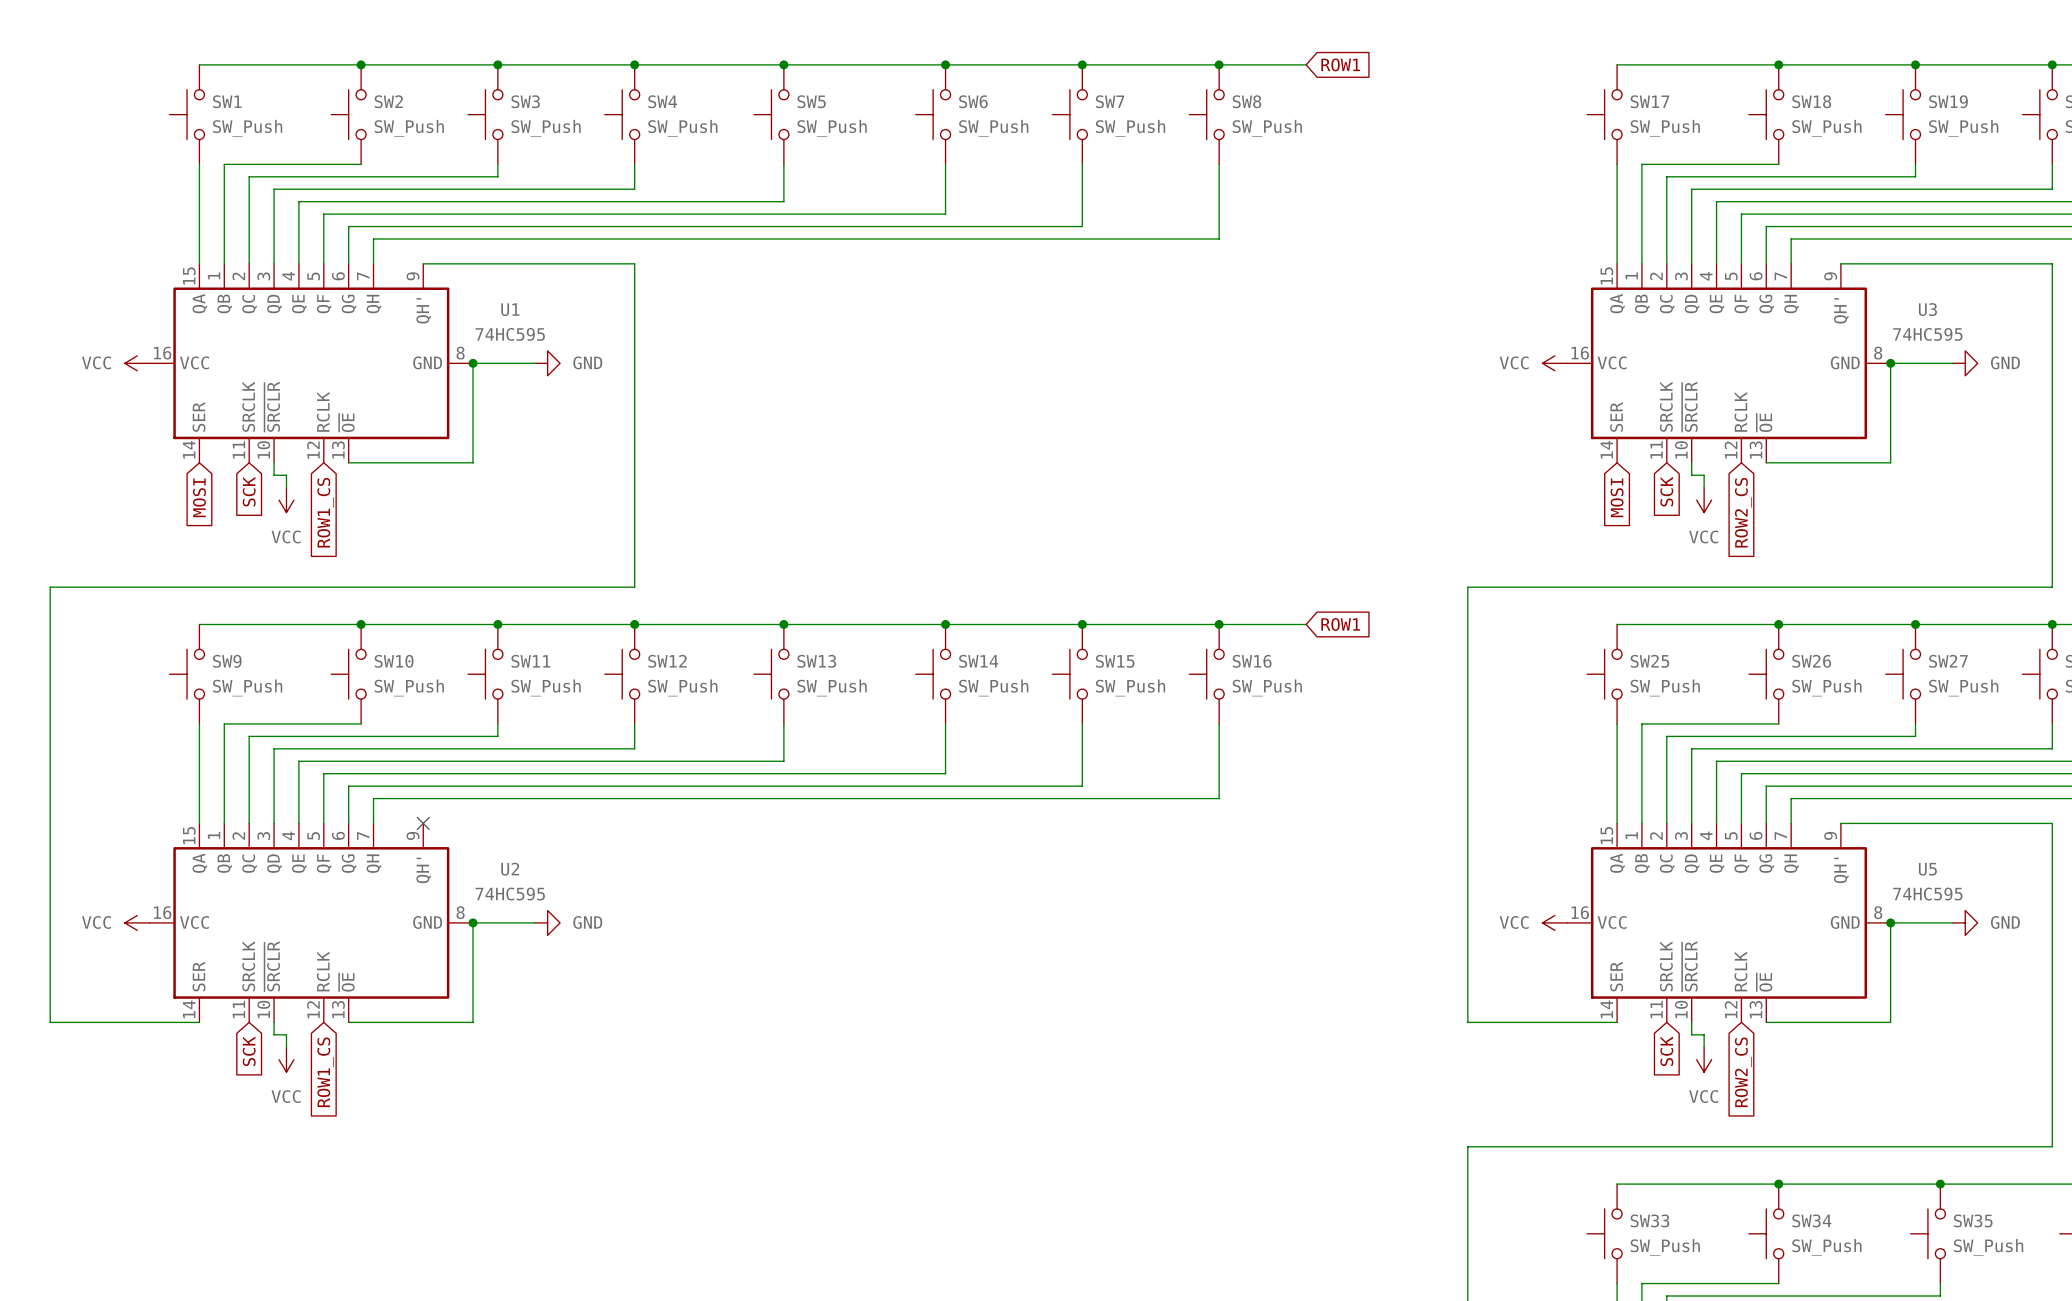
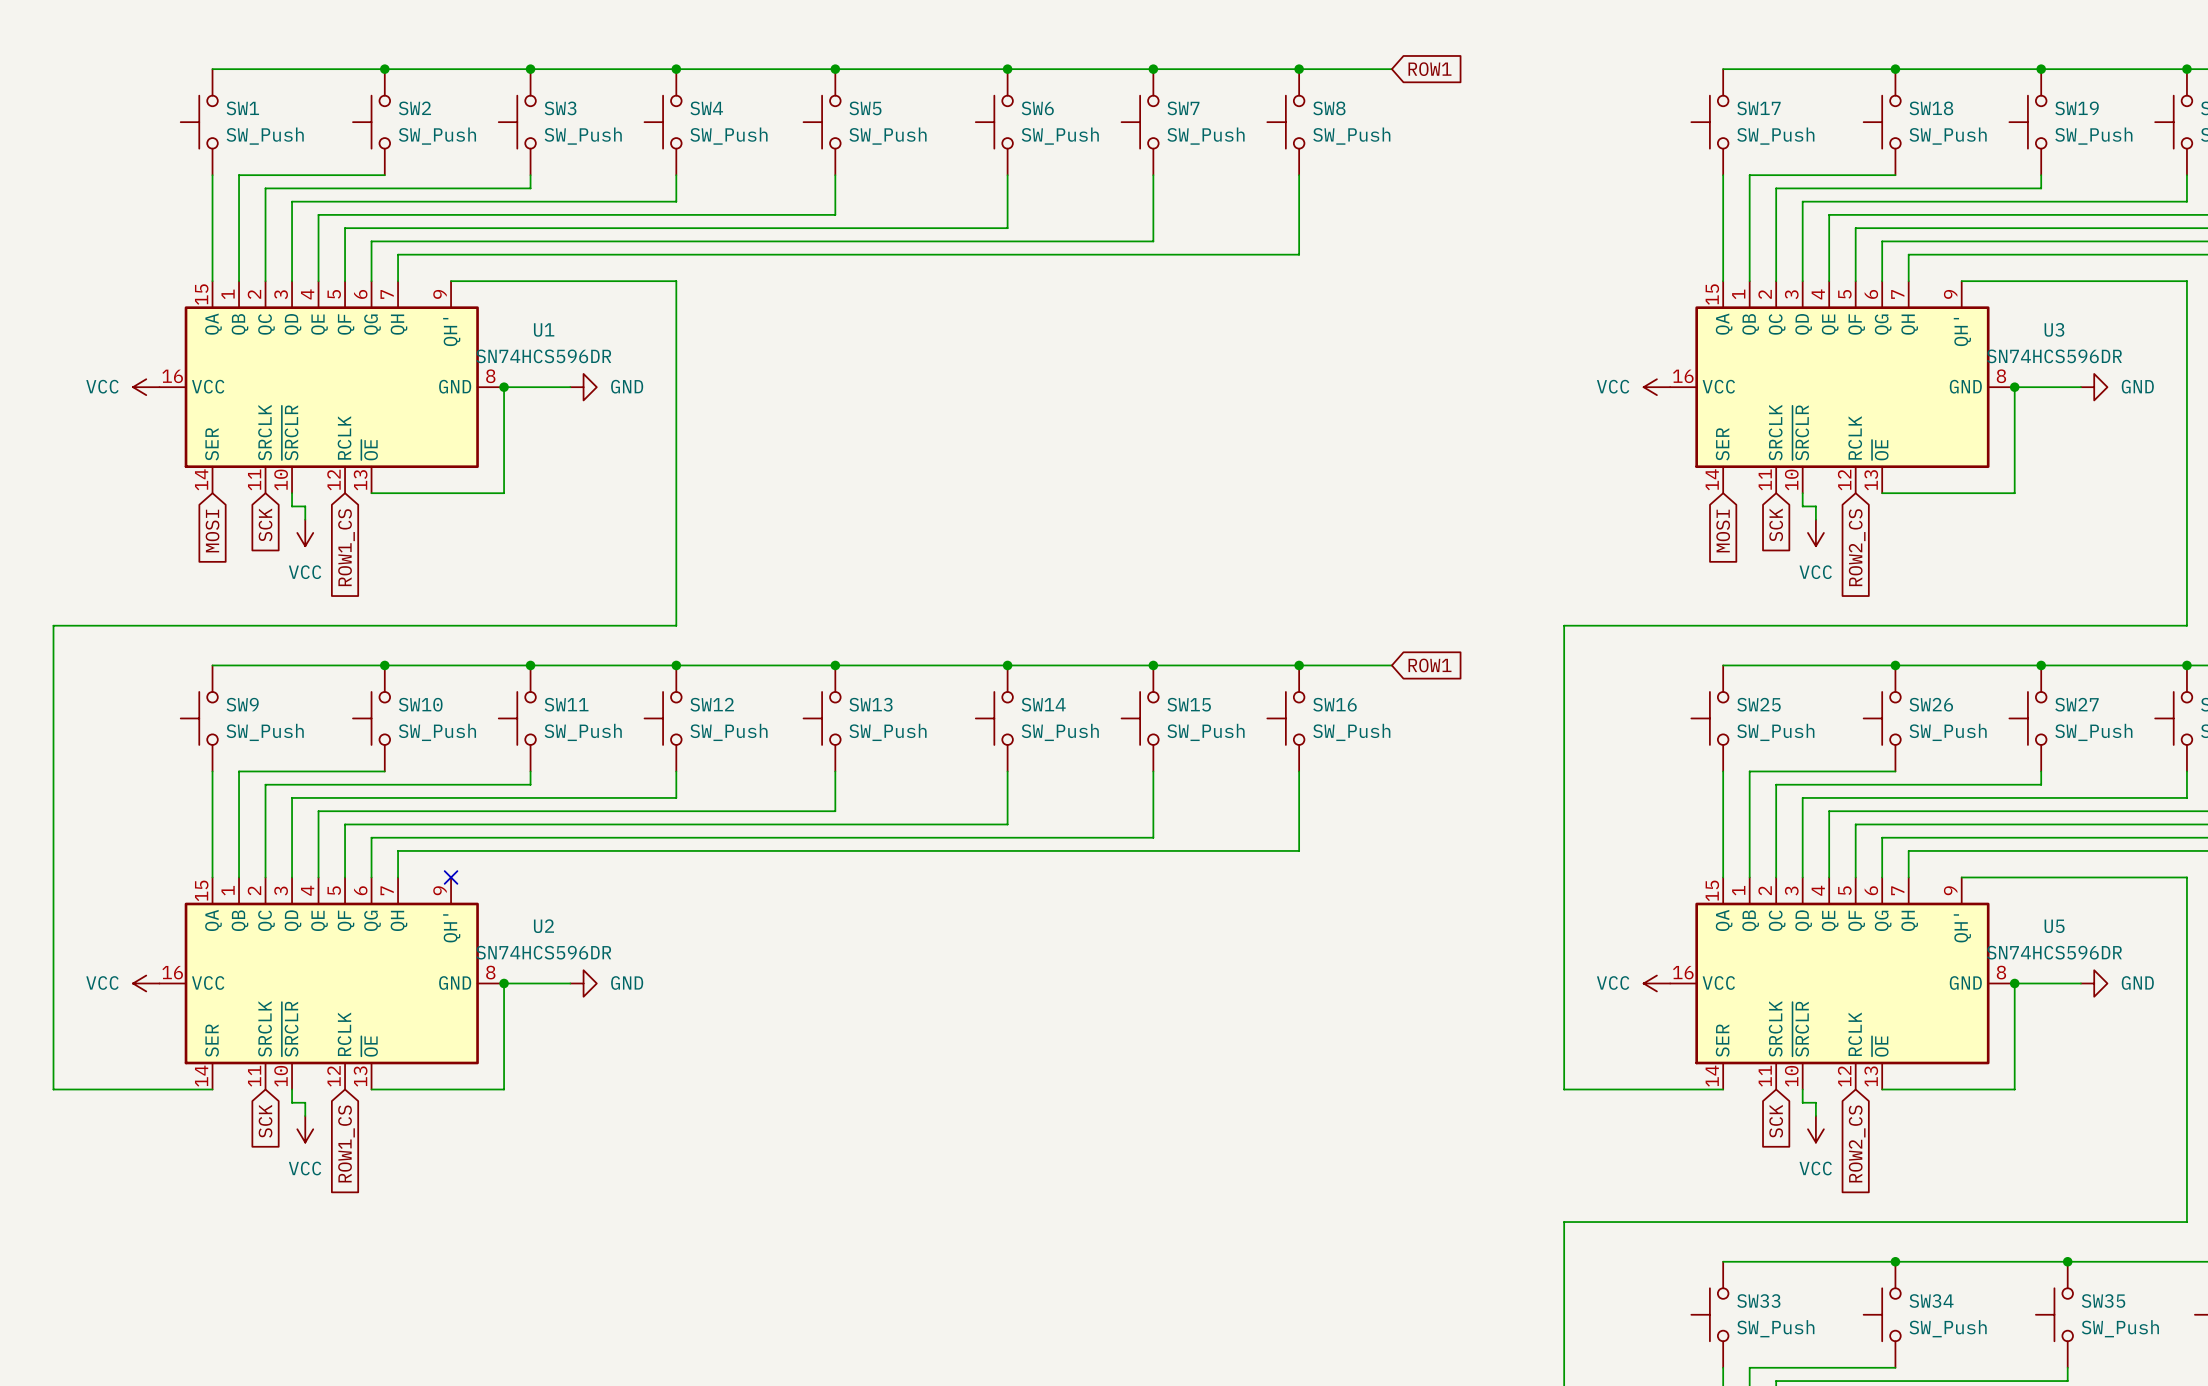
U1 value: 74HC595 (510, 334) -> SN74HCS596DR (543, 356)
U3 value: 74HC595 (1927, 334) -> SN74HCS596DR (2054, 356)
U2 value: 74HC595 (510, 894) -> SN74HCS596DR (543, 952)
U5 value: 74HC595 (1927, 894) -> SN74HCS596DR (2054, 952)

